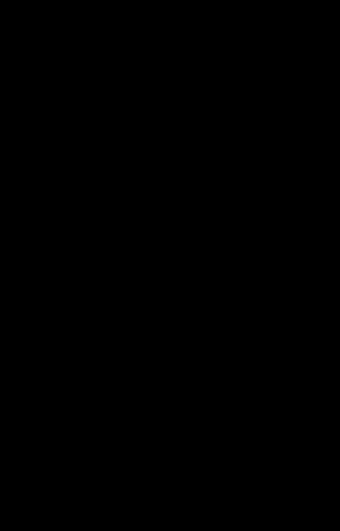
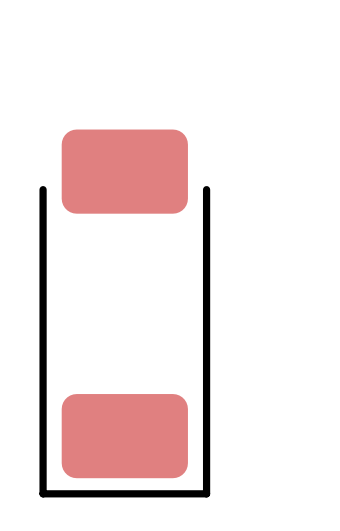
part: none -> (124, 313)

